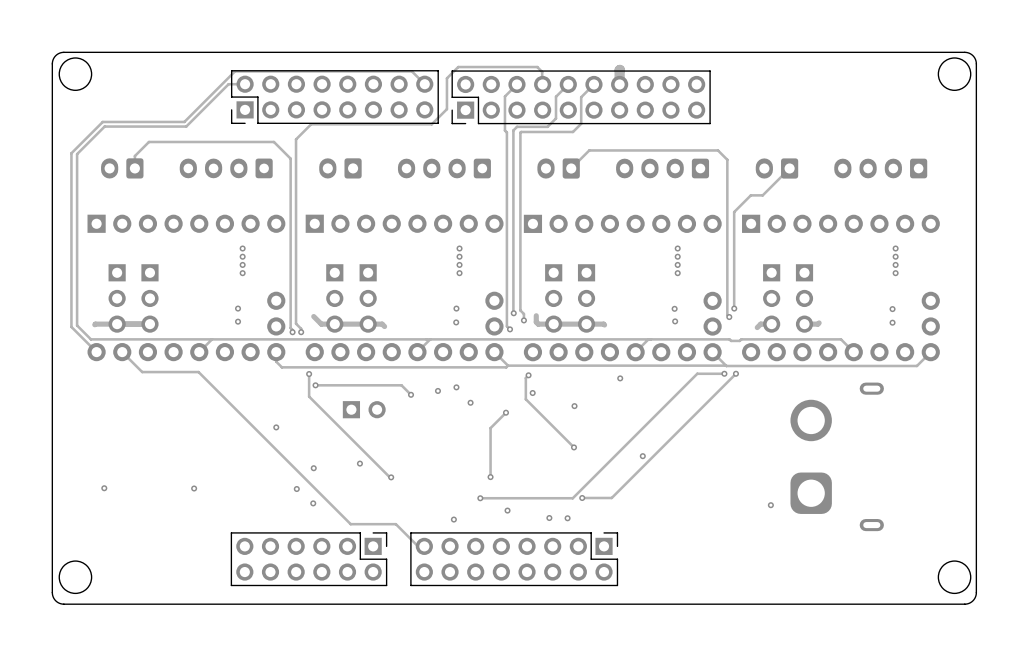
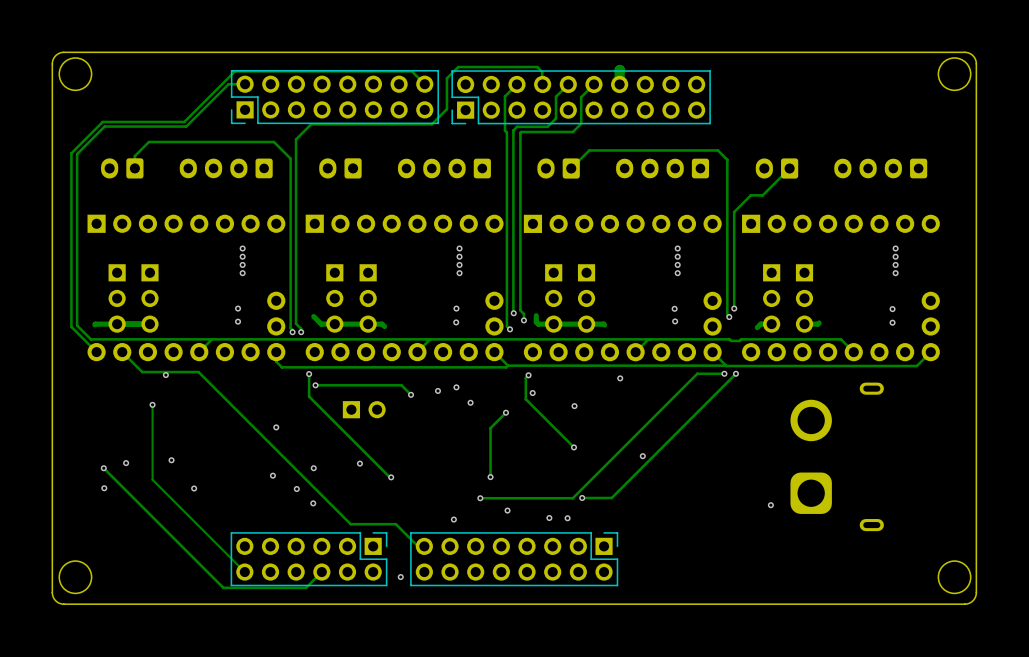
via: none -> (165, 375)
track: none -> (152, 404) (152, 479) (244, 572)
via: none -> (152, 404)
via: none -> (171, 460)
via: none -> (126, 463)
track: none -> (103, 468) (223, 587) (306, 587) (321, 572)
via: none -> (103, 468)
via: none -> (272, 475)
via: none -> (400, 577)

